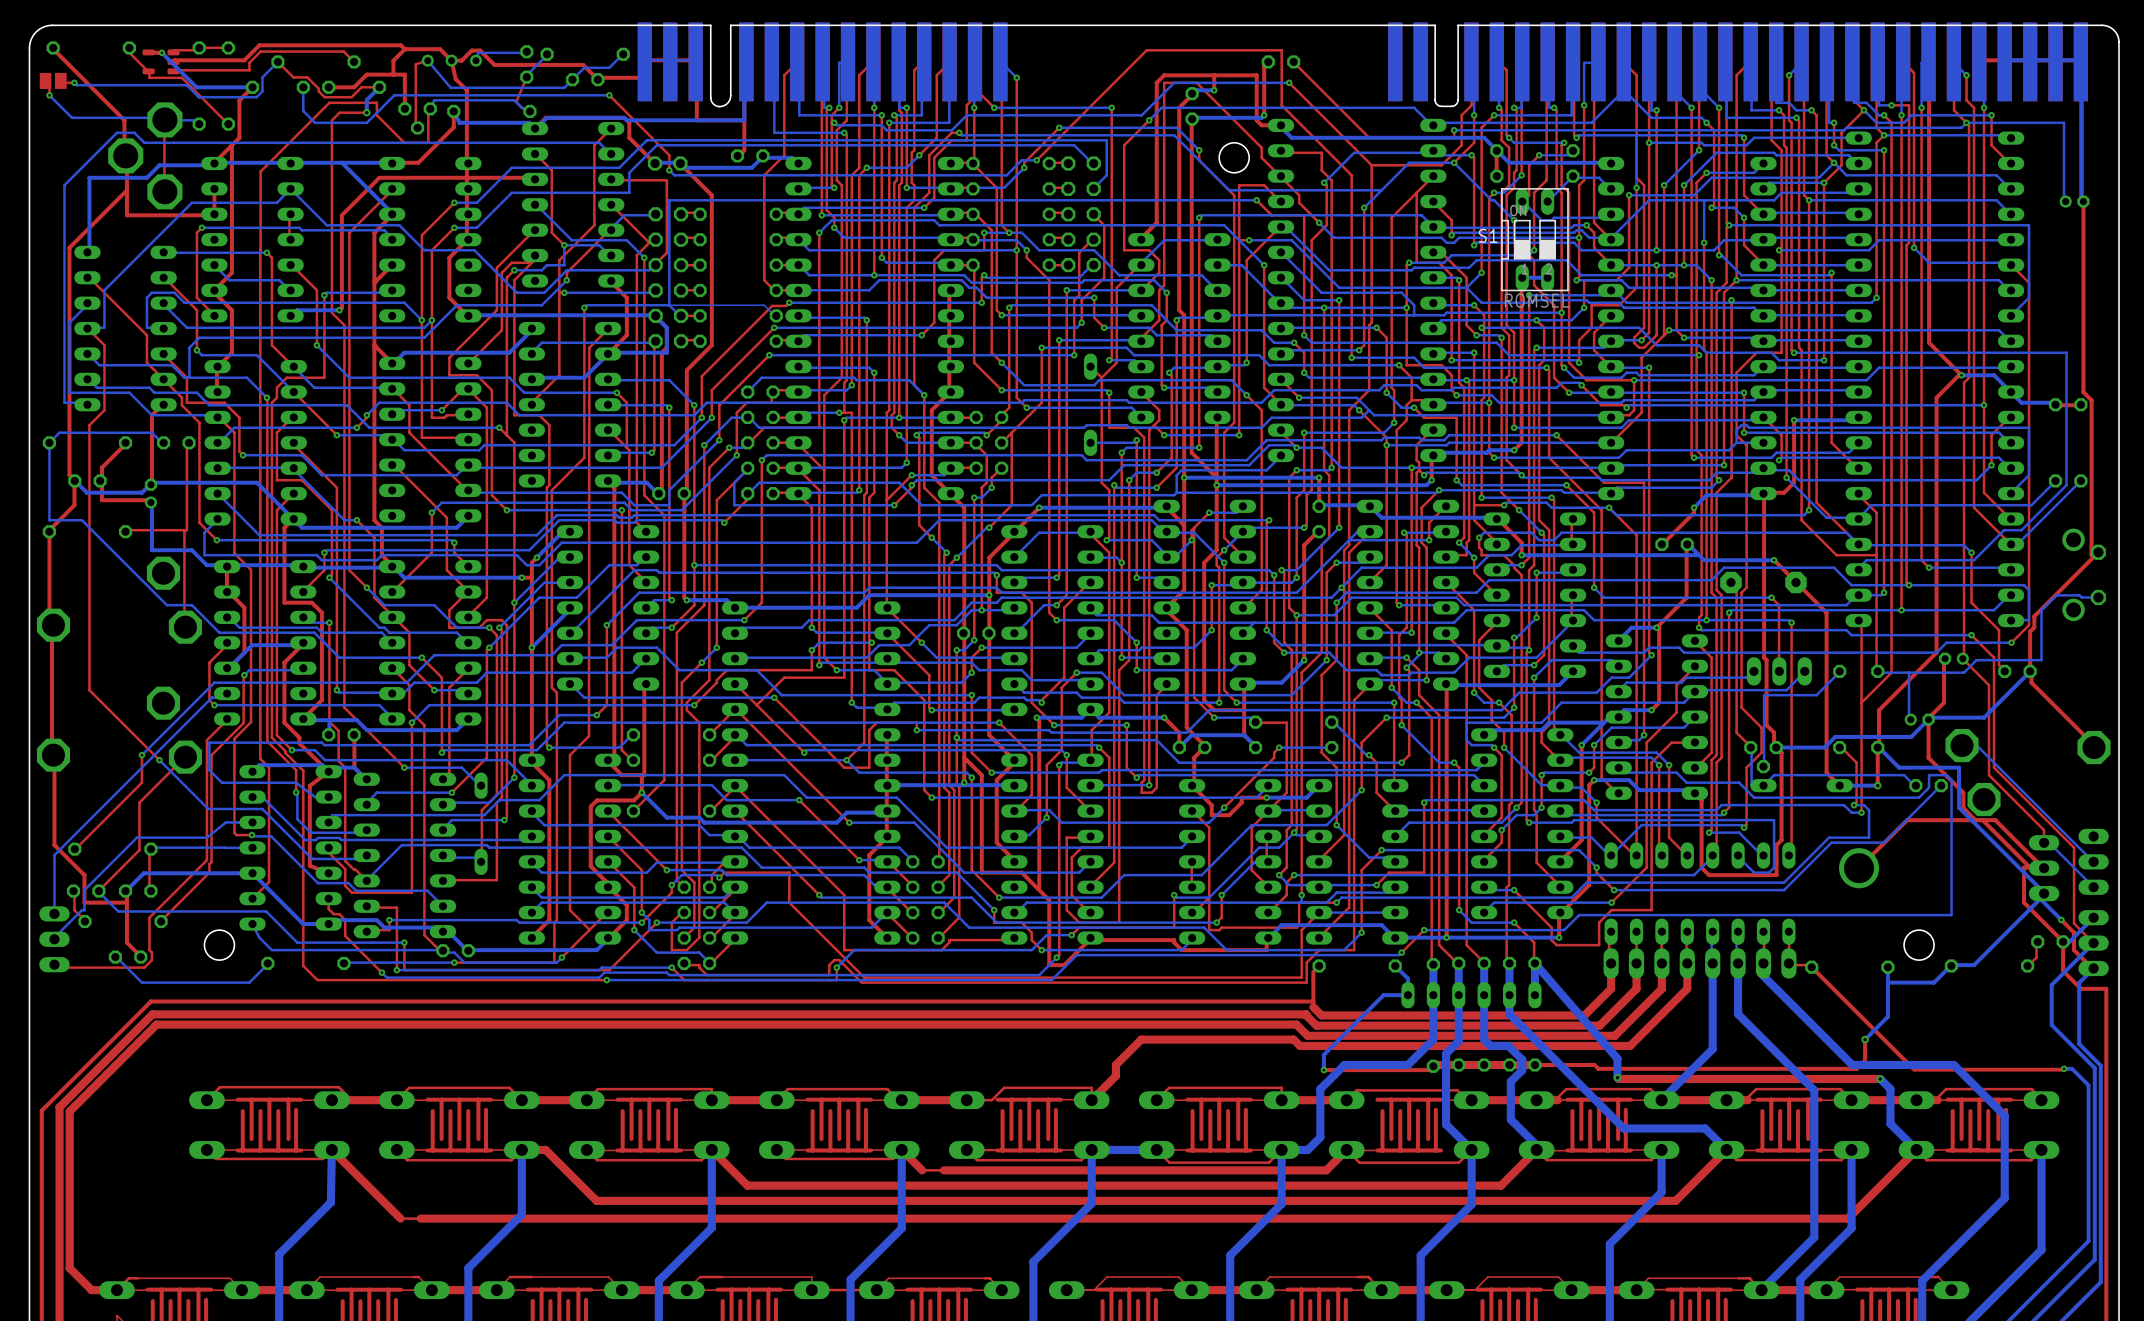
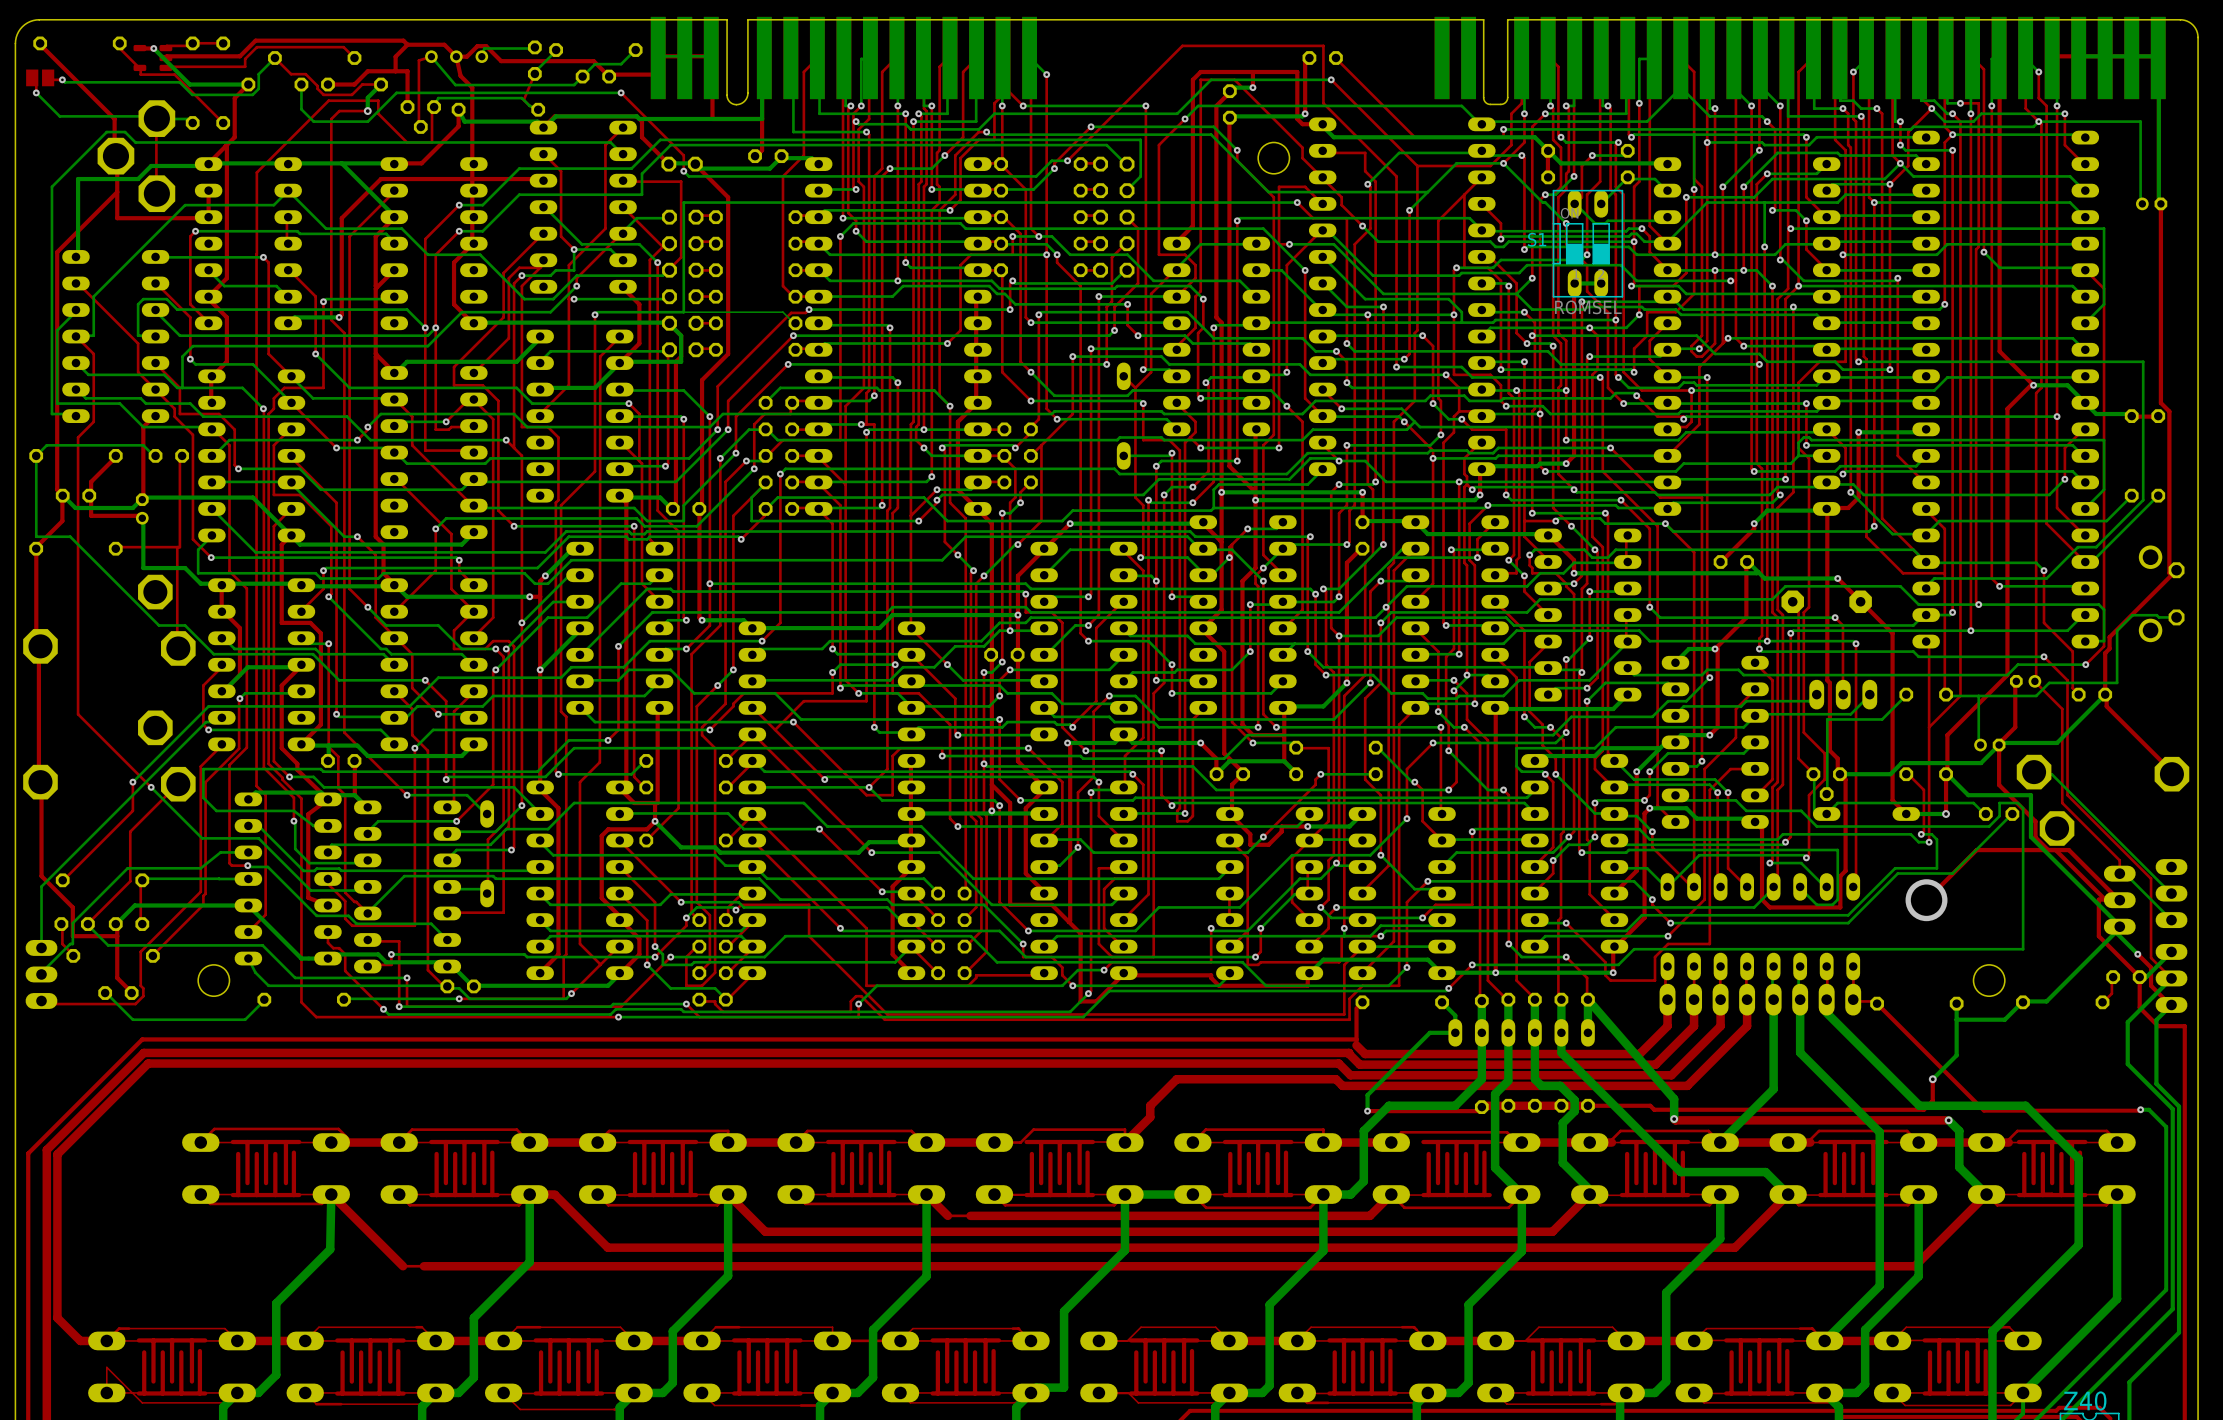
bottom track: (669, 305) (679, 315) -> none

